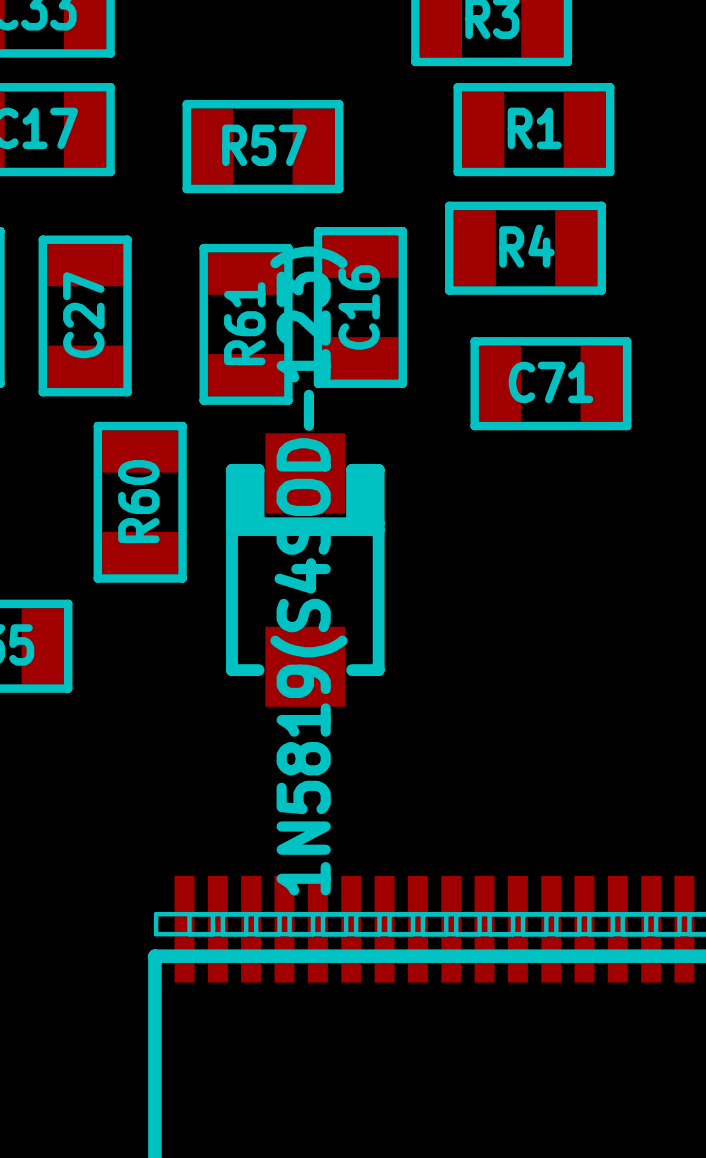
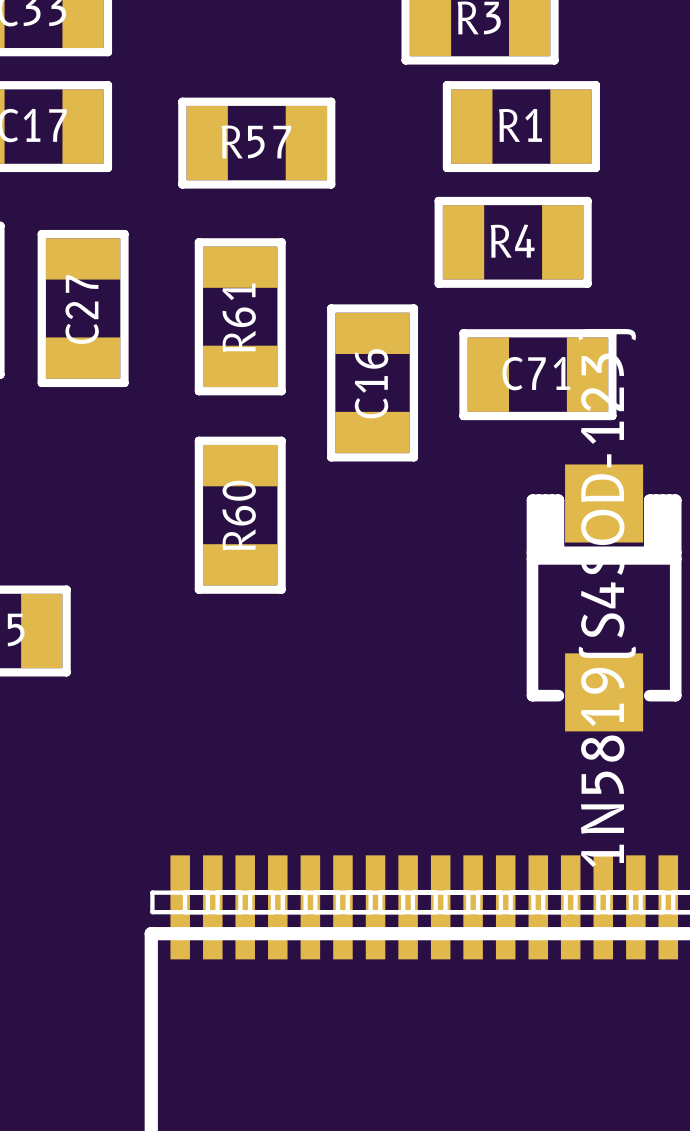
C16 position: (360, 307) -> (372, 382)
R60 position: (140, 502) -> (240, 515)
part position: (305, 570) -> (604, 597)

